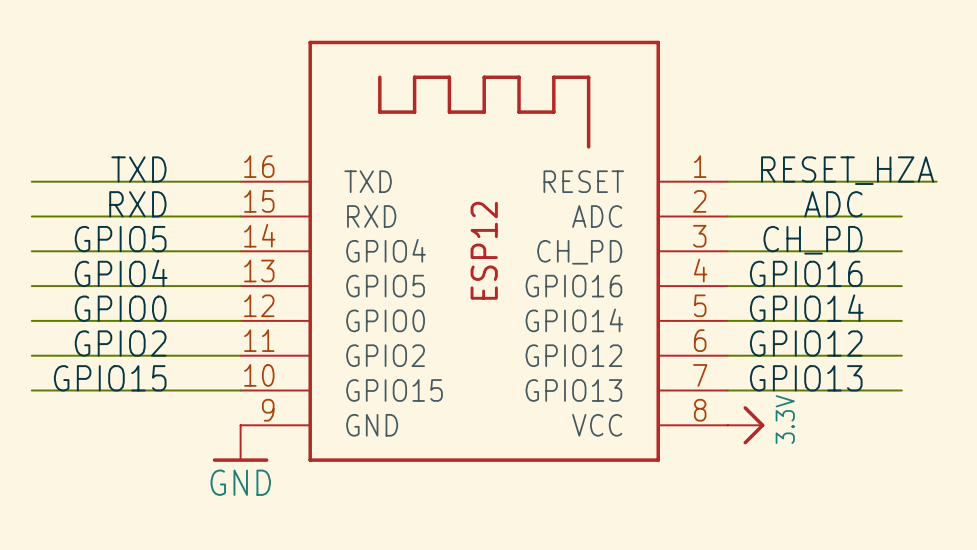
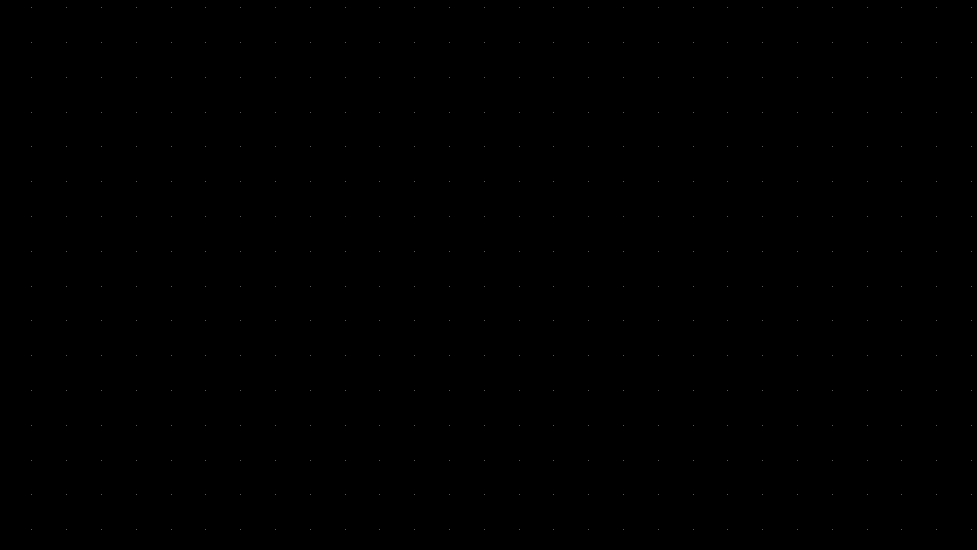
label: TXD (138, 169) -> none
label: RESET_HZA (847, 170) -> none
wire: (31, 181) (240, 181) -> none
wire: (727, 181) (936, 181) -> none
label: RXD (137, 204) -> none
label: ADC (833, 204) -> none
wire: (31, 216) (240, 216) -> none
wire: (727, 216) (901, 216) -> none
label: GPIO5 (120, 239) -> none
label: CH_PD (813, 240) -> none
wire: (31, 251) (240, 251) -> none
part: (484, 251) -> none
wire: (727, 251) (901, 251) -> none
label: GPIO4 (121, 273) -> none
label: GPIO16 (806, 273) -> none
wire: (31, 286) (240, 286) -> none
wire: (727, 286) (901, 286) -> none
label: GPIO0 (120, 308) -> none
label: GPIO14 (806, 308) -> none
wire: (31, 320) (240, 320) -> none
wire: (727, 320) (901, 320) -> none
label: GPIO2 (120, 343) -> none
label: GPIO12 (806, 343) -> none
wire: (31, 355) (240, 355) -> none
wire: (727, 355) (901, 355) -> none
label: GPIO15 (110, 378) -> none
label: GPIO13 (806, 378) -> none
wire: (31, 390) (240, 390) -> none
wire: (727, 390) (901, 390) -> none
power symbol: 3.3V (746, 425) -> none
power symbol: GND (240, 443) -> none

